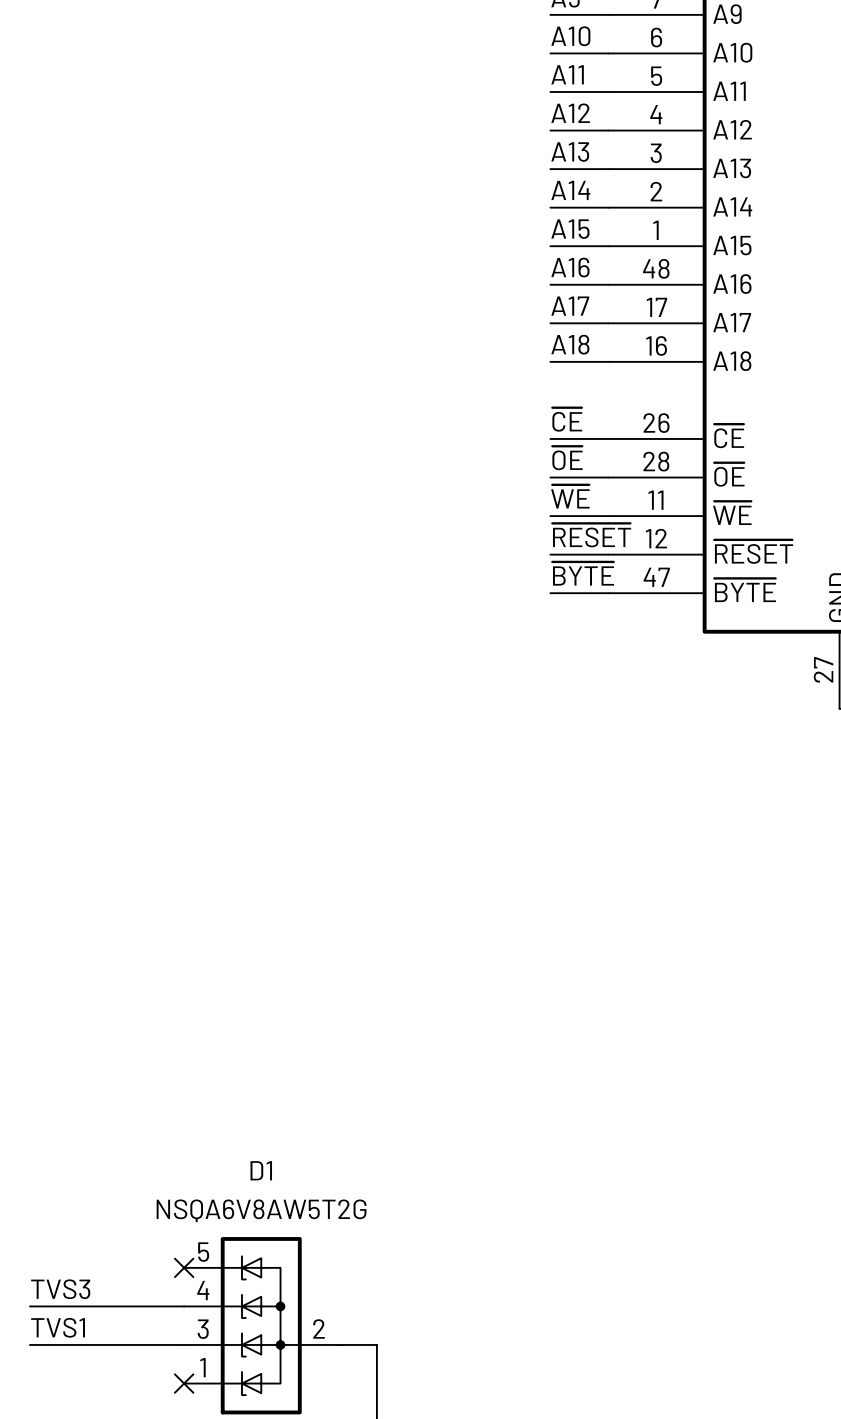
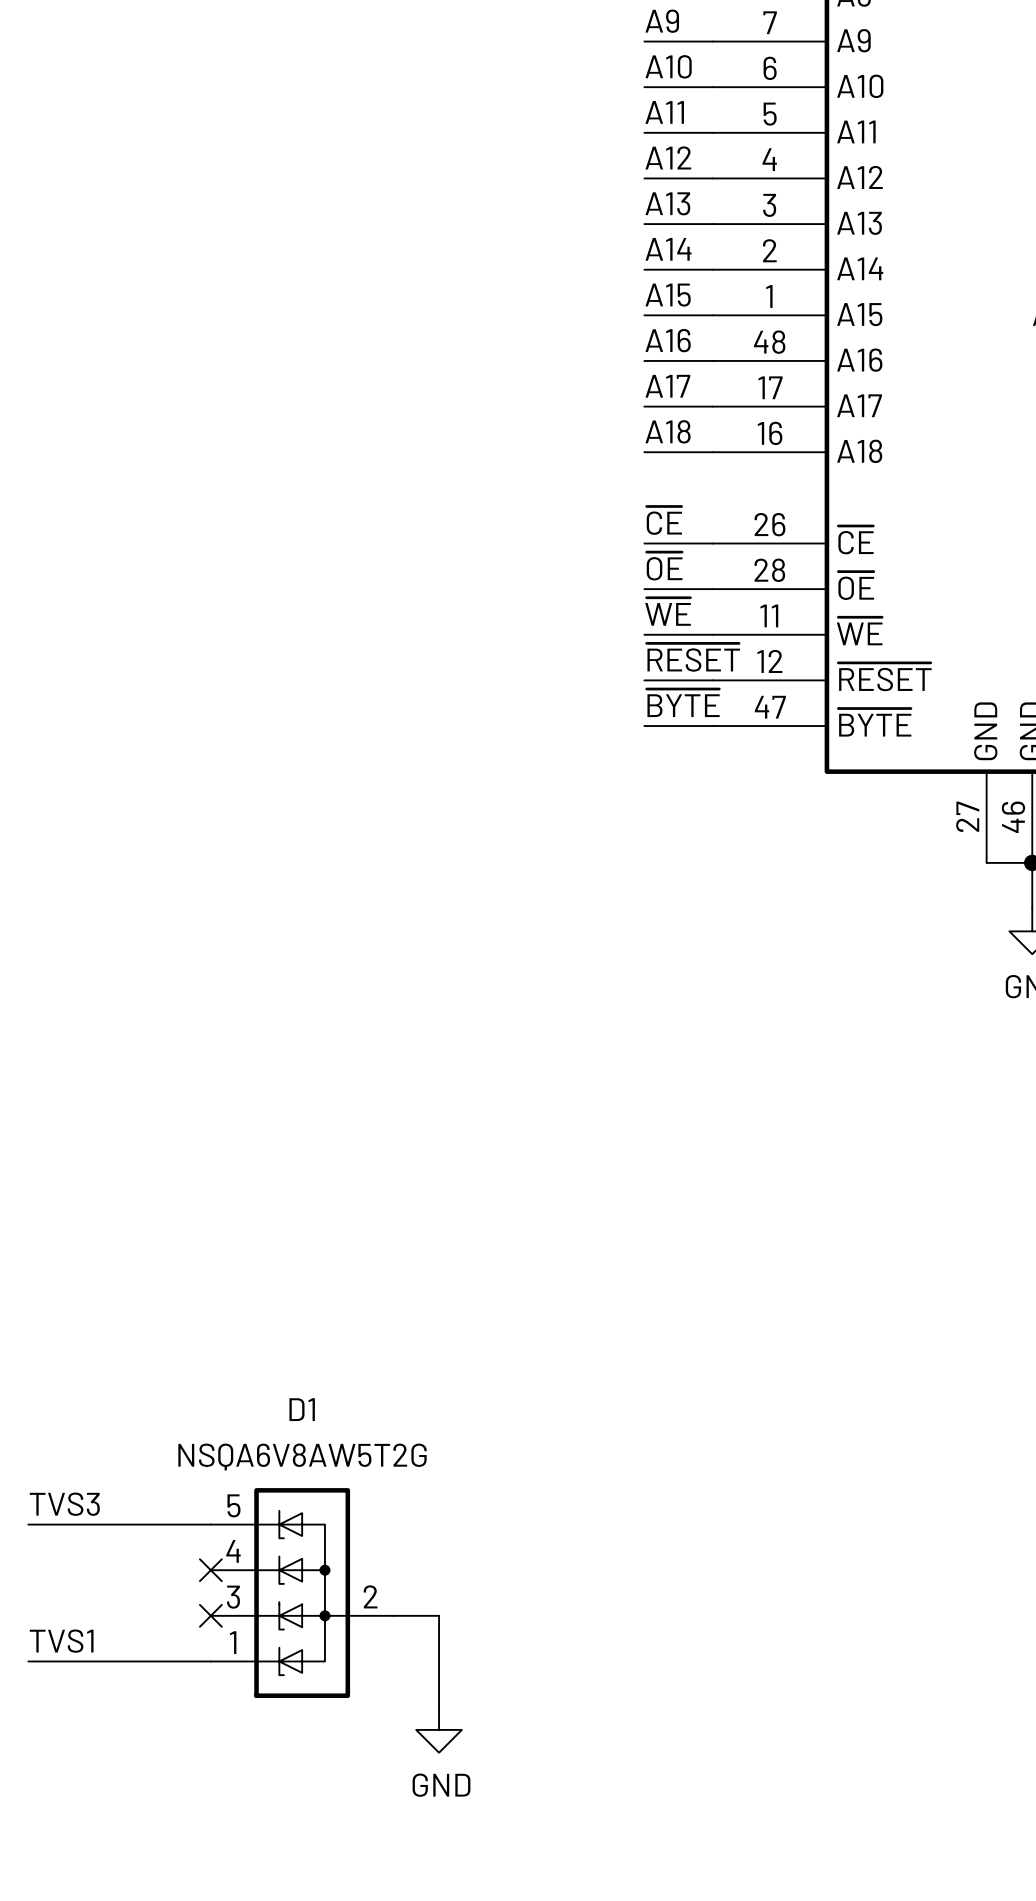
no-connect mark: (184, 1267) -> none
label position: TVS3 (60, 1289) -> TVS3 (64, 1504)
wire: (29, 1306) (184, 1306) -> (28, 1524) (210, 1524)
no-connect mark: none -> (210, 1570)
label position: TVS1 (58, 1327) -> TVS1 (61, 1641)
wire: (29, 1344) (184, 1344) -> (28, 1661) (210, 1661)
no-connect mark: none -> (210, 1615)
no-connect mark: (184, 1383) -> none

